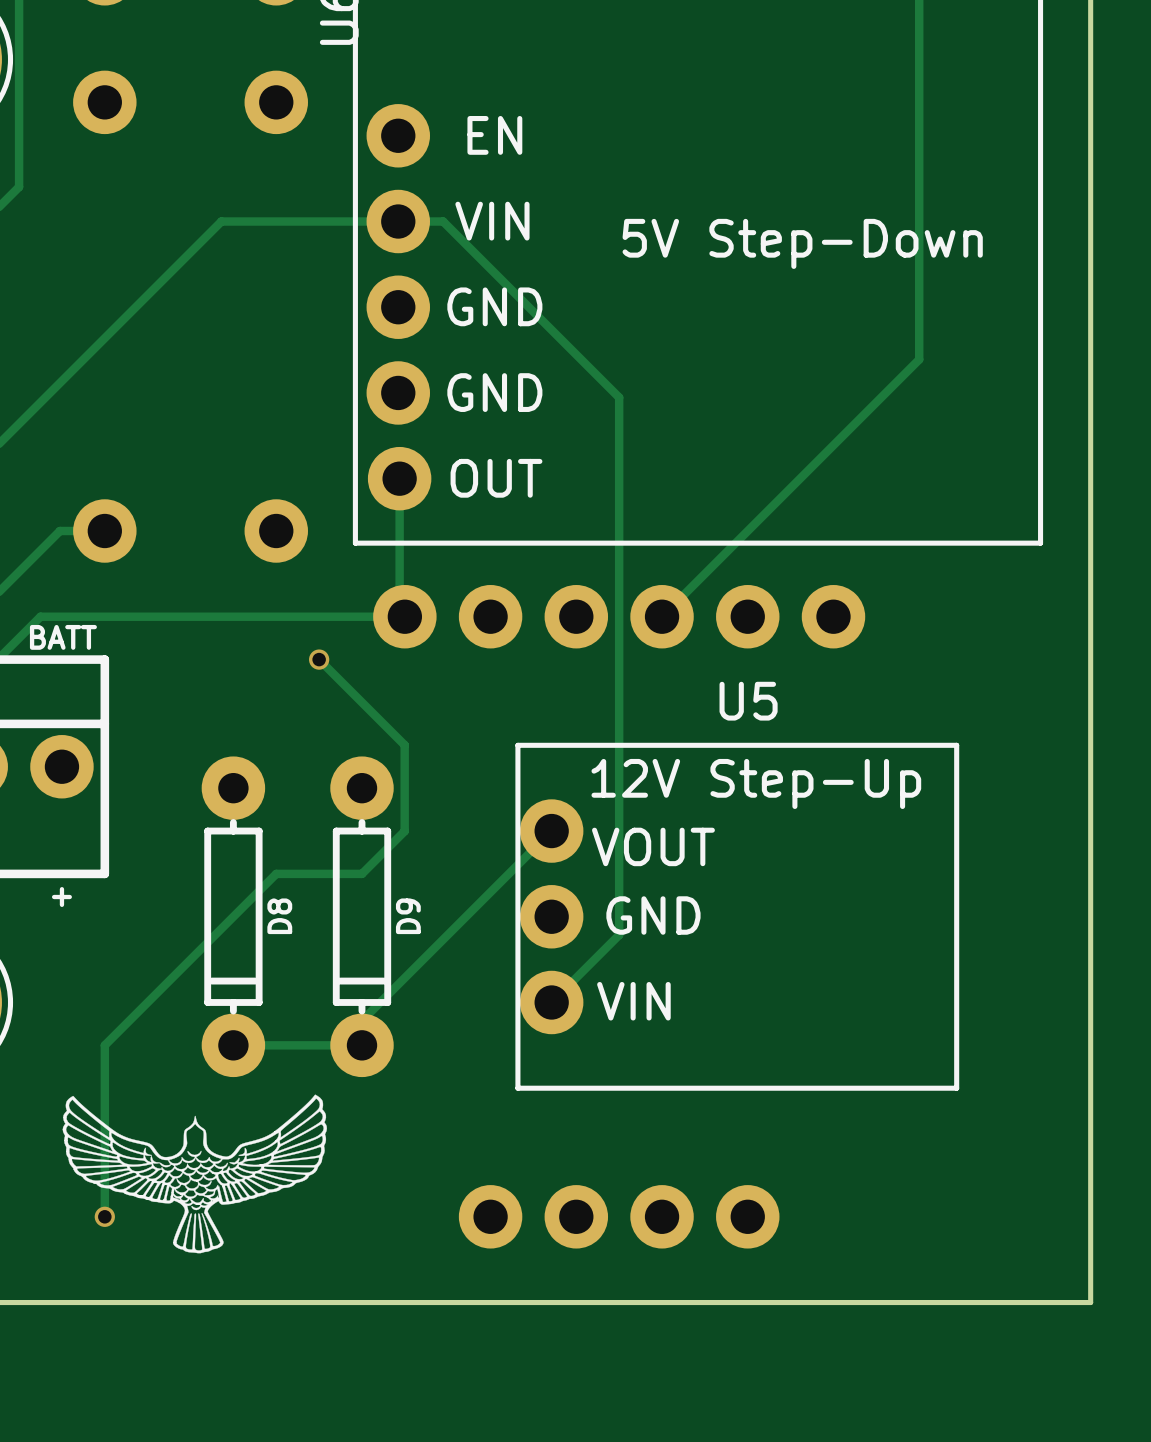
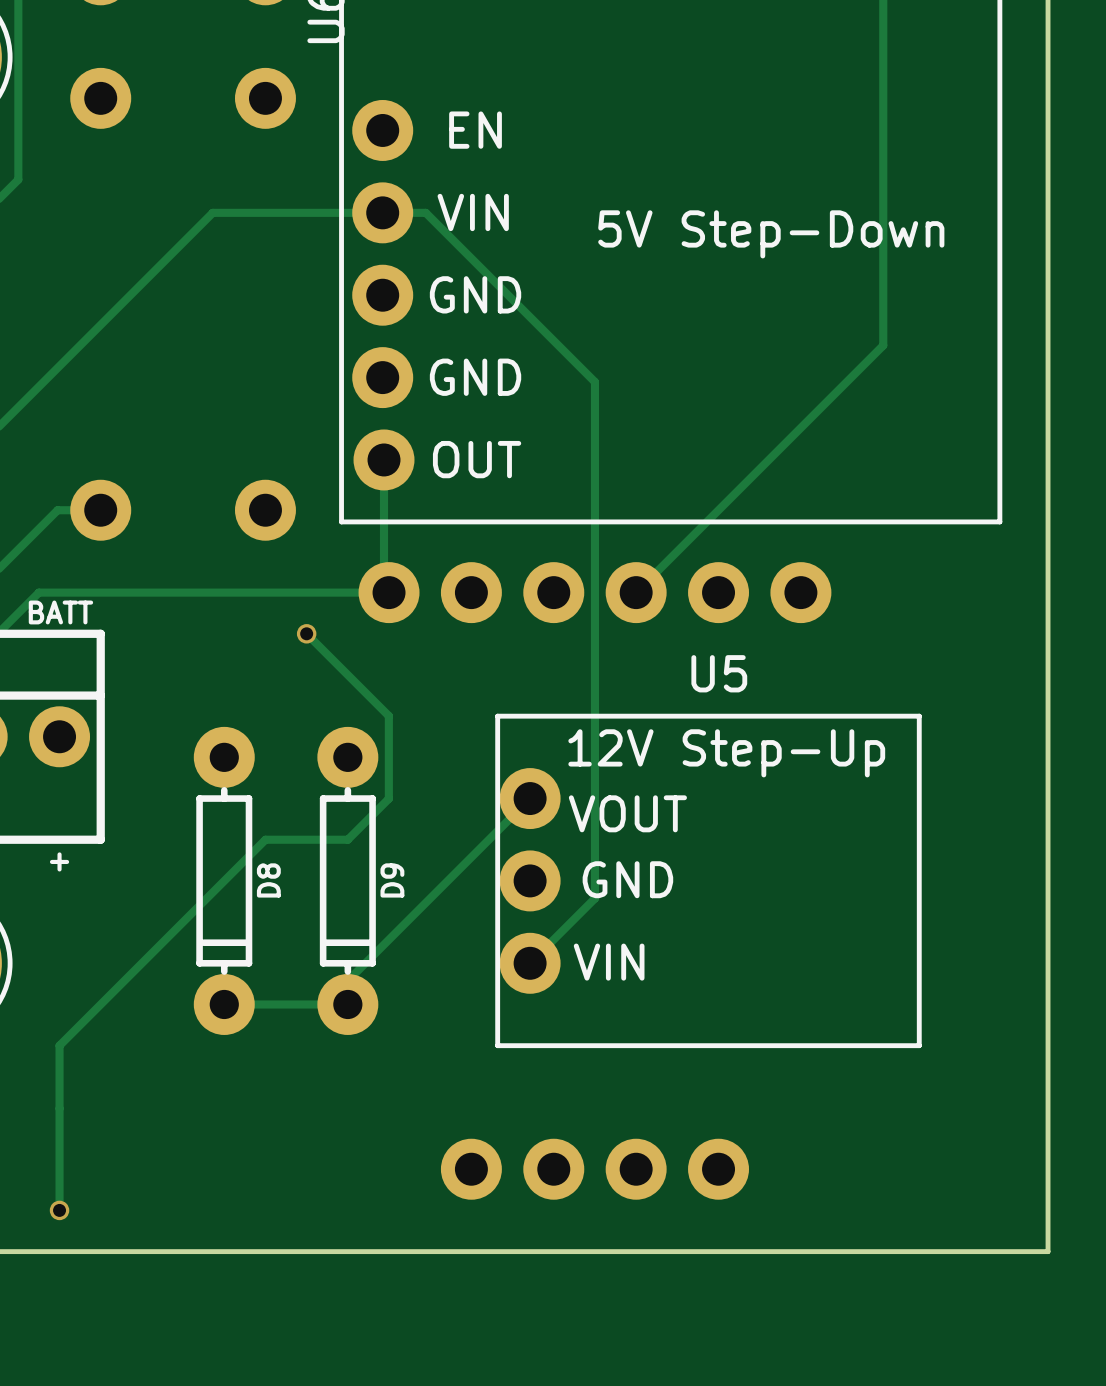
track: (104, 1045) (104, 1216) -> (100, 1004) (59, 1045) (59, 1210)
drawing: [62, 1094, 327, 1254] -> none
via position: (104, 1216) -> (59, 1210)

